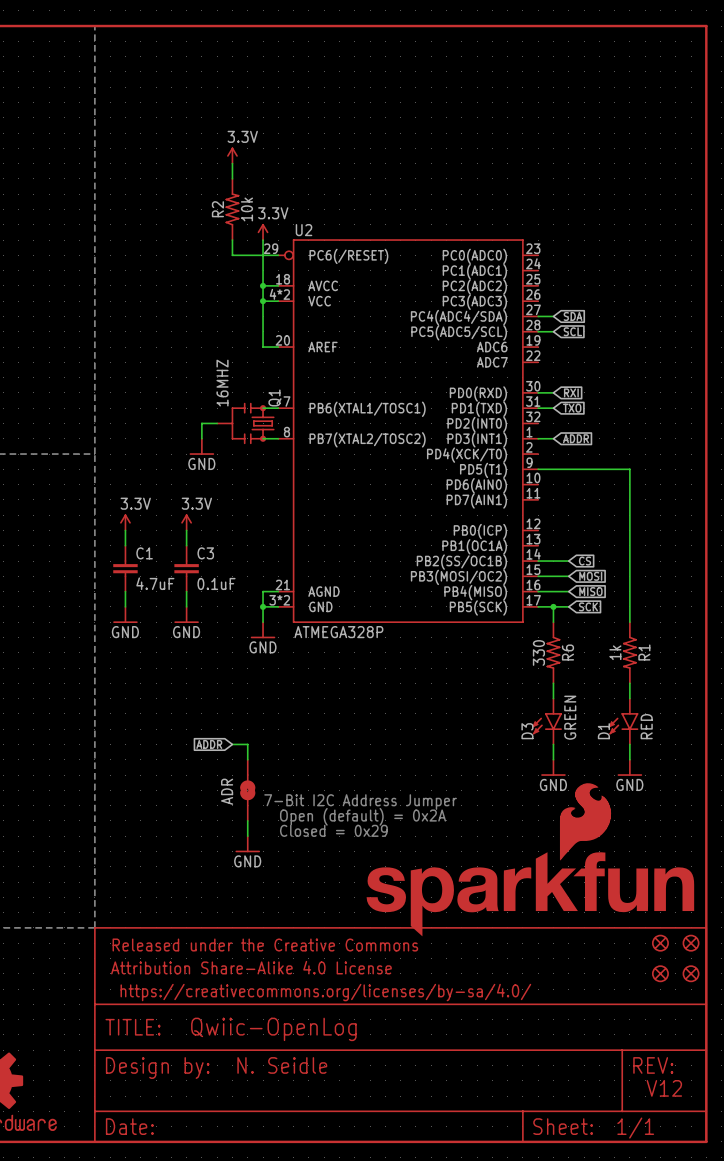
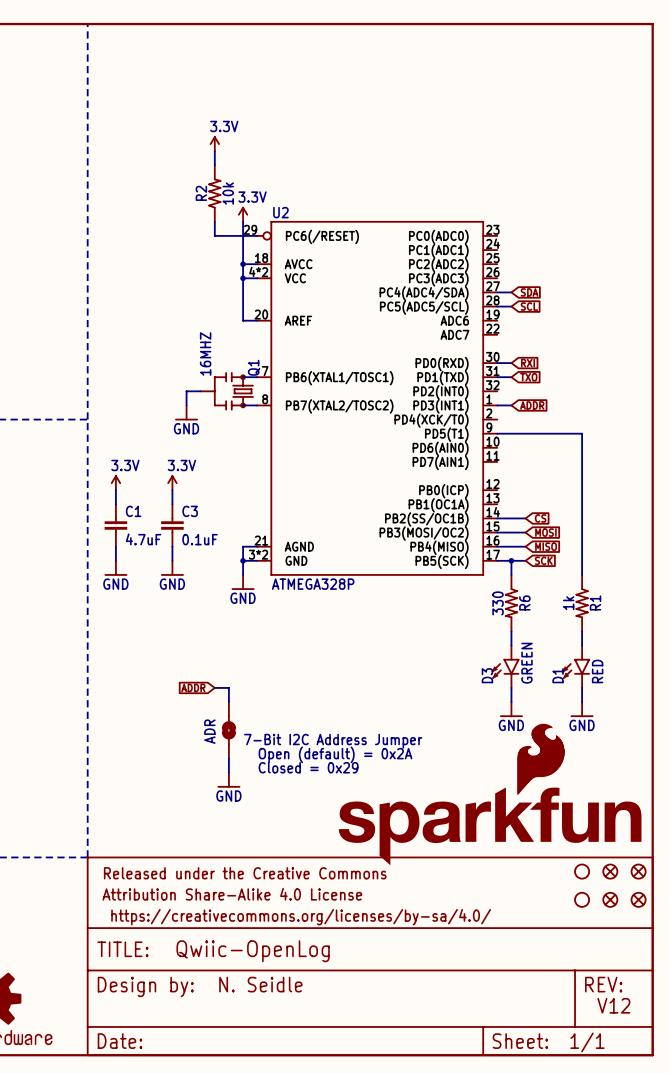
part: none -> (582, 871)
part: none -> (582, 899)

